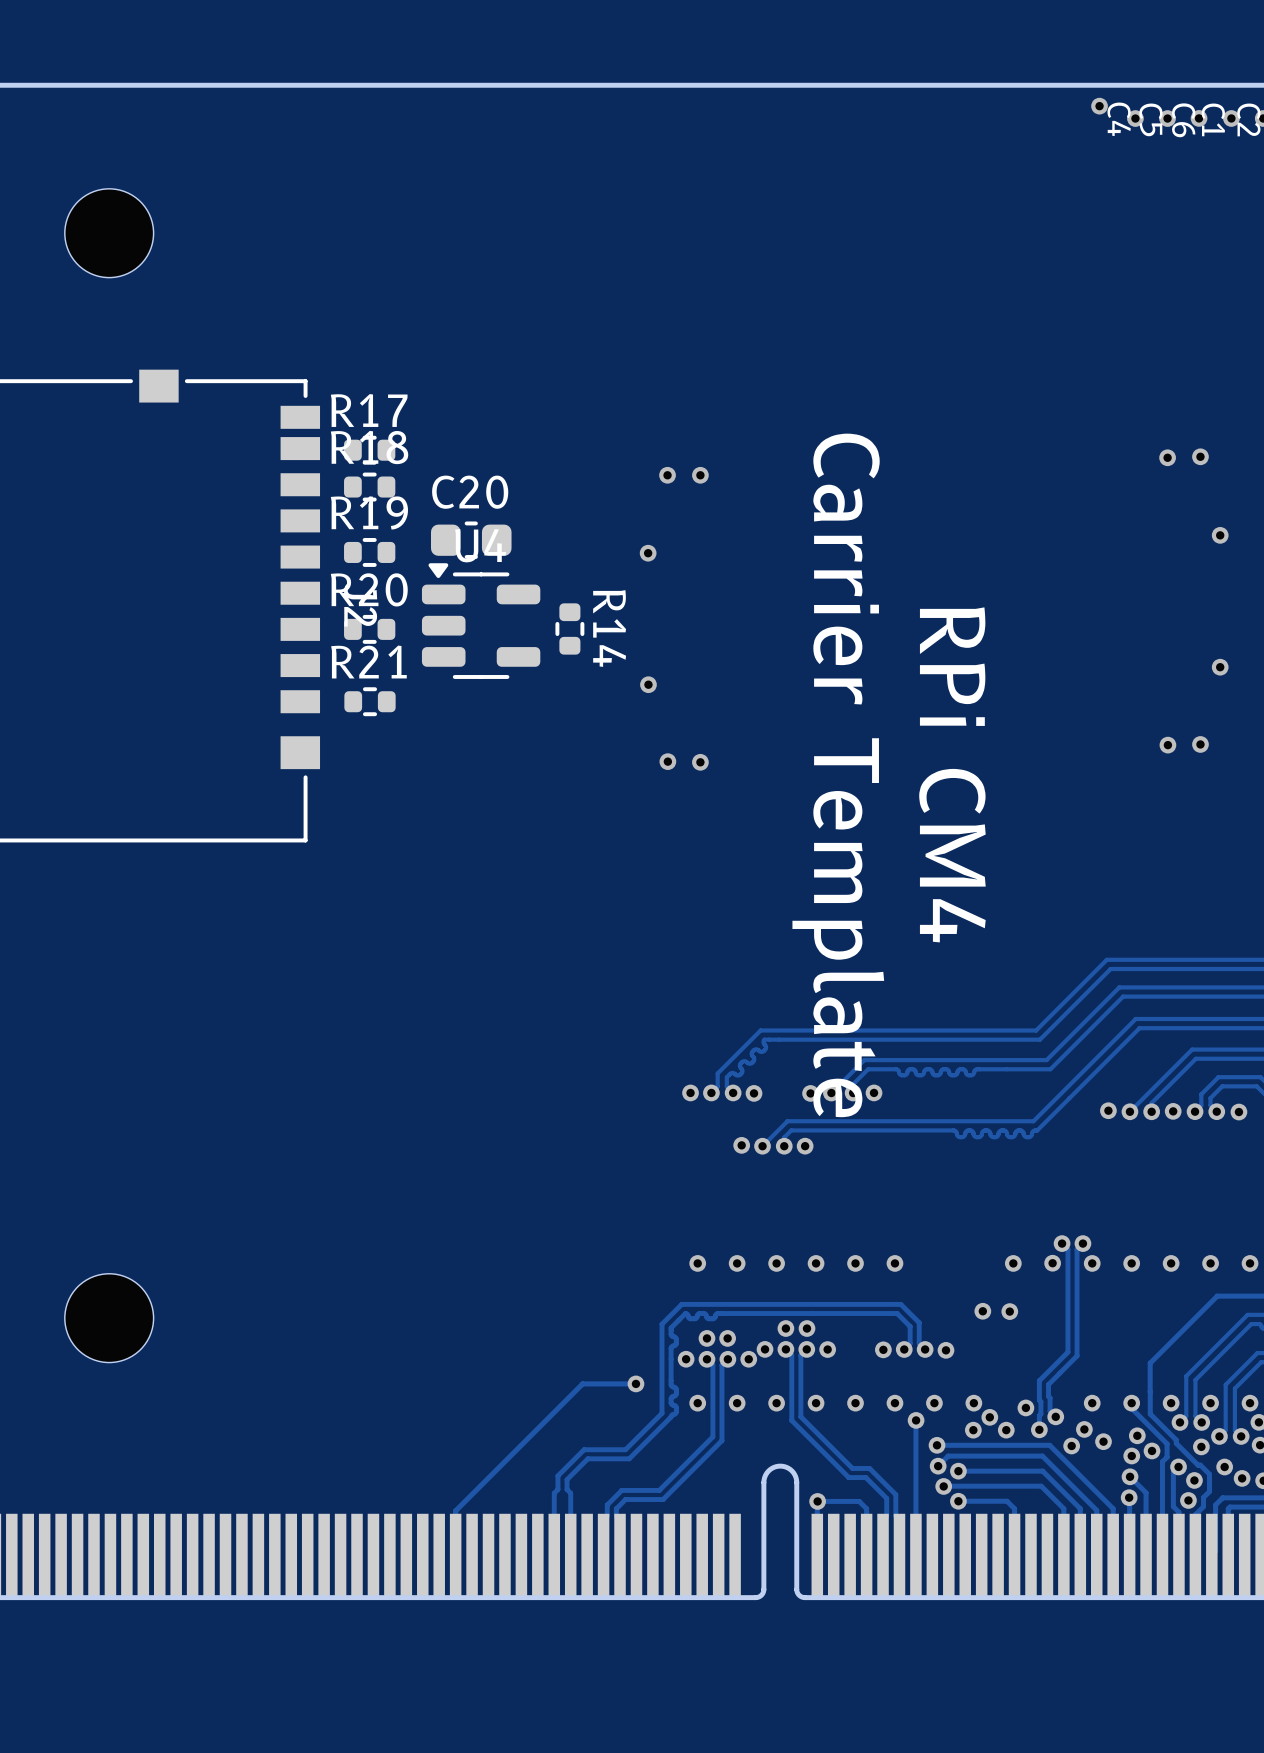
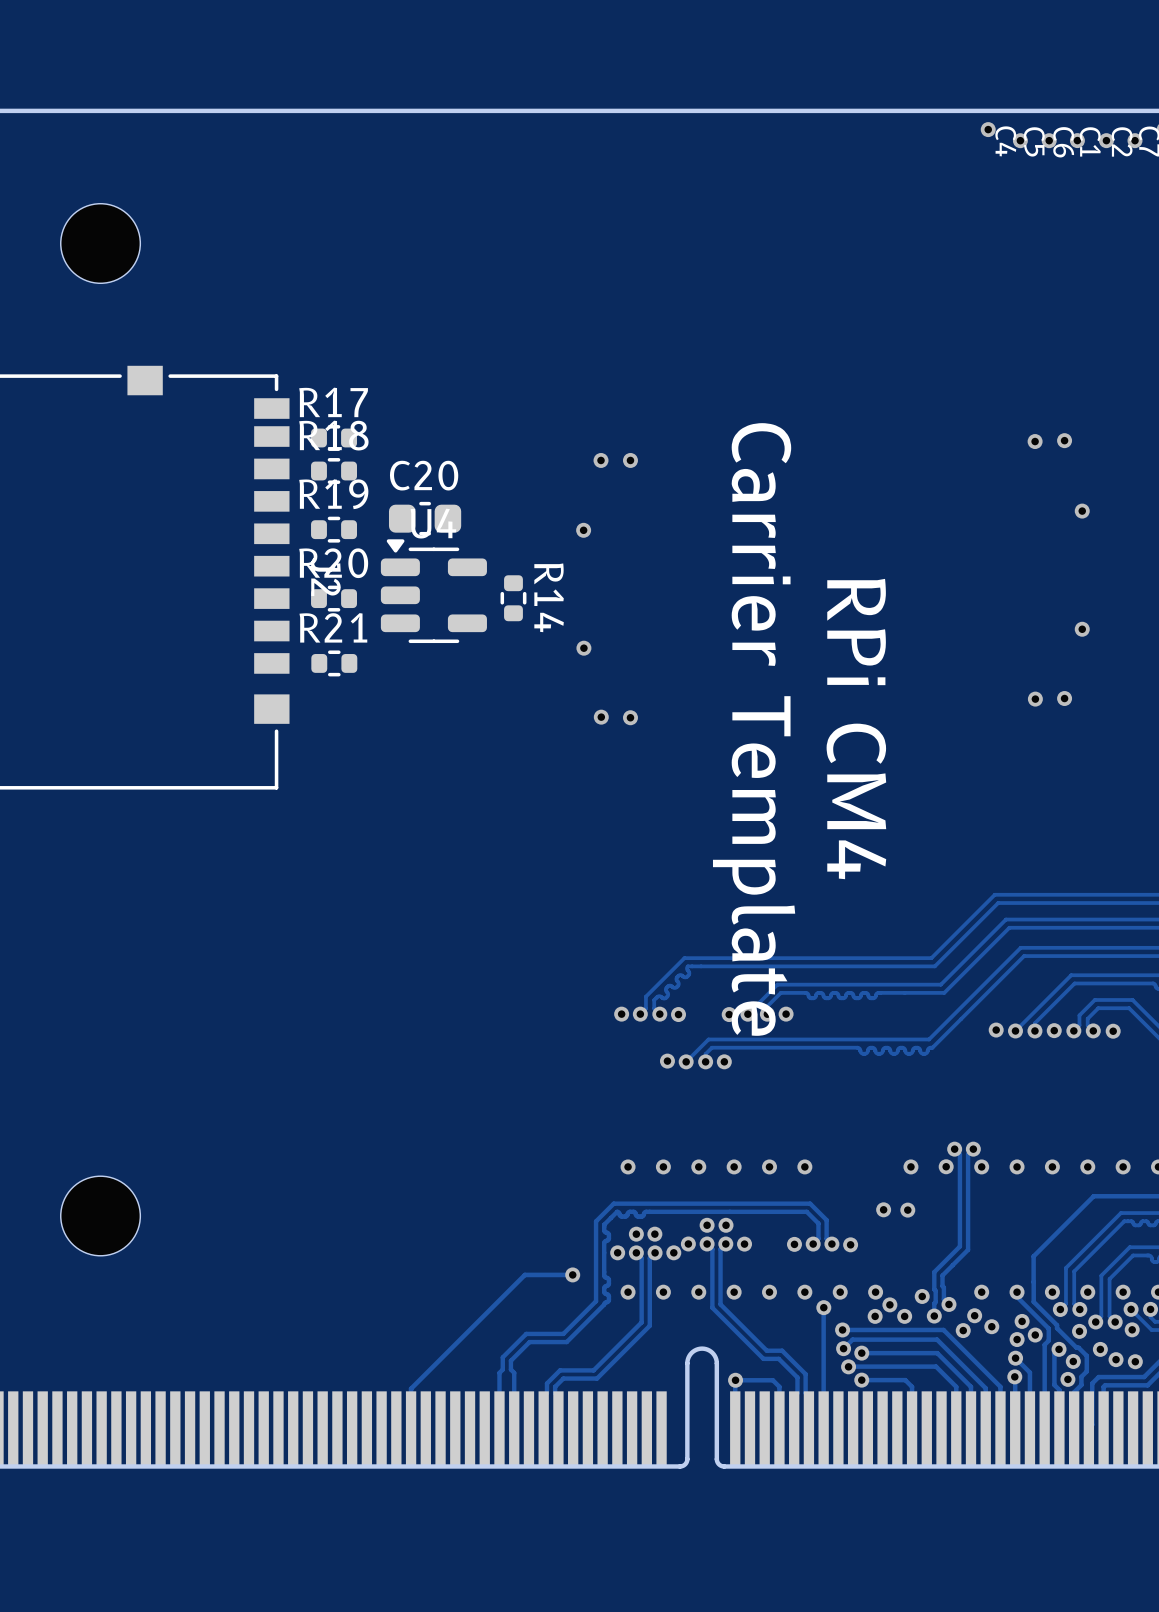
via position: (1200, 456) -> (1064, 440)
via position: (1167, 457) -> (1035, 441)
via position: (1220, 535) -> (1082, 511)
via position: (1220, 667) -> (1082, 629)
via position: (1200, 744) -> (1064, 698)
via position: (1167, 745) -> (1035, 699)

